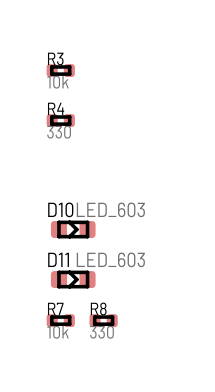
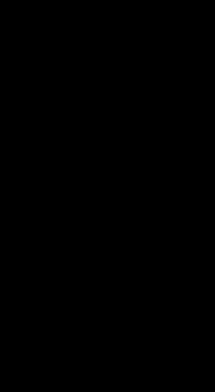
R3: 10k (60, 70) -> none
R4: 330 (60, 120) -> none
D10: LED_603 (73, 229) -> none
D11: LED_603 (73, 279) -> none
R7: 10k (60, 320) -> none
R8: 330 (103, 320) -> none

